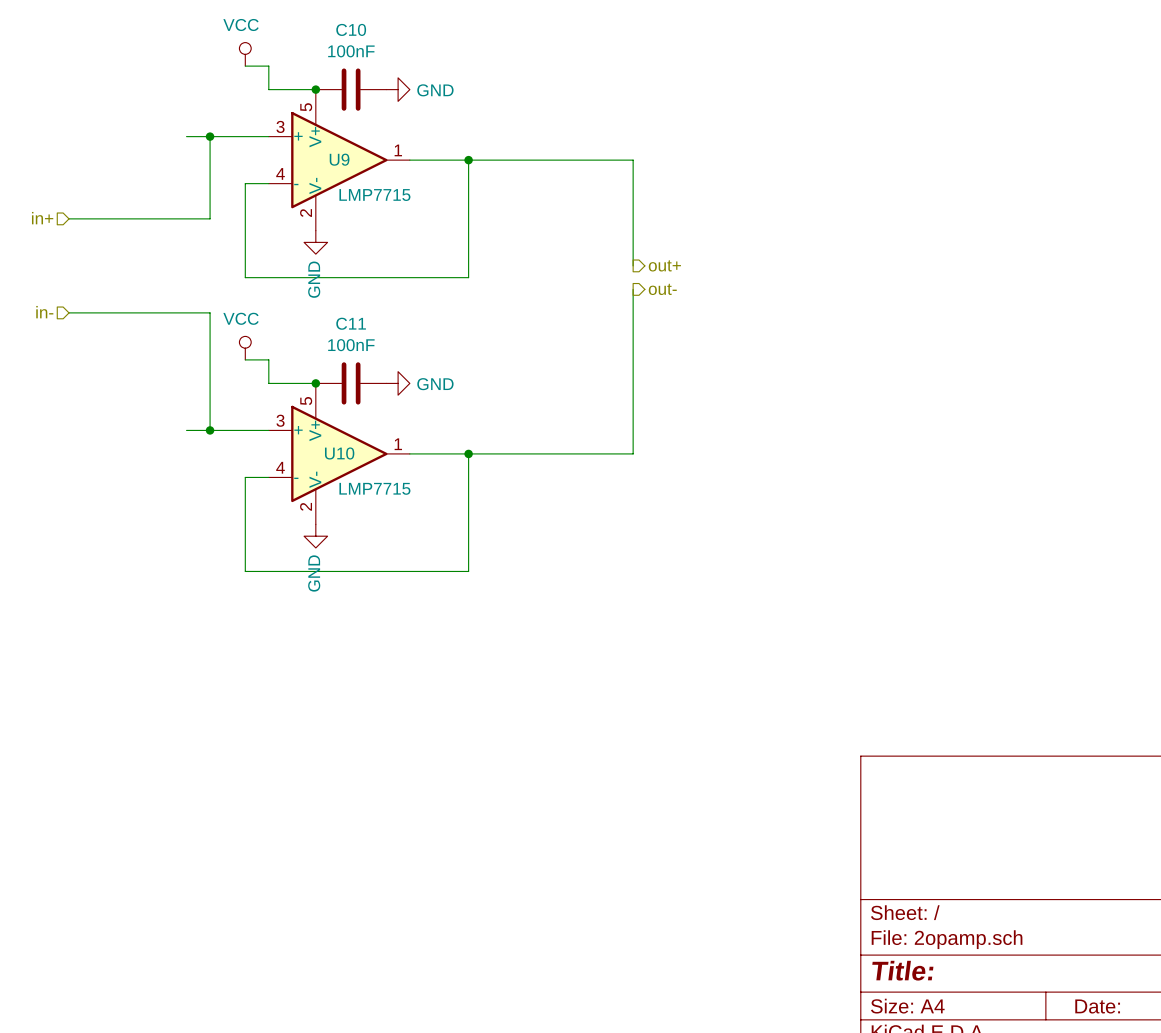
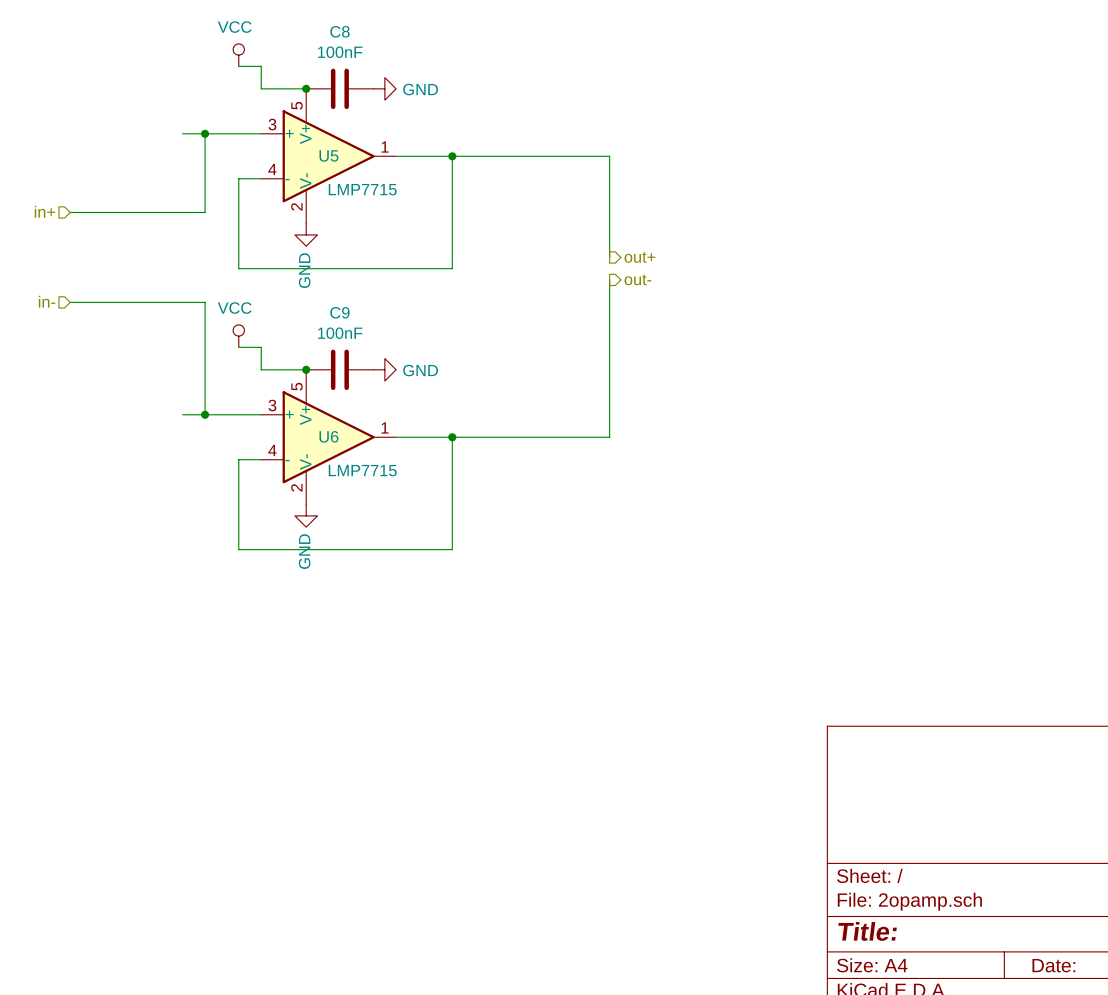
C10 name: C10 (351, 29) -> C8 (339, 31)
U9 name: U9 (339, 159) -> U5 (328, 155)
C11 name: C11 (351, 323) -> C9 (339, 312)
U10 name: U10 (339, 453) -> U6 (328, 436)

